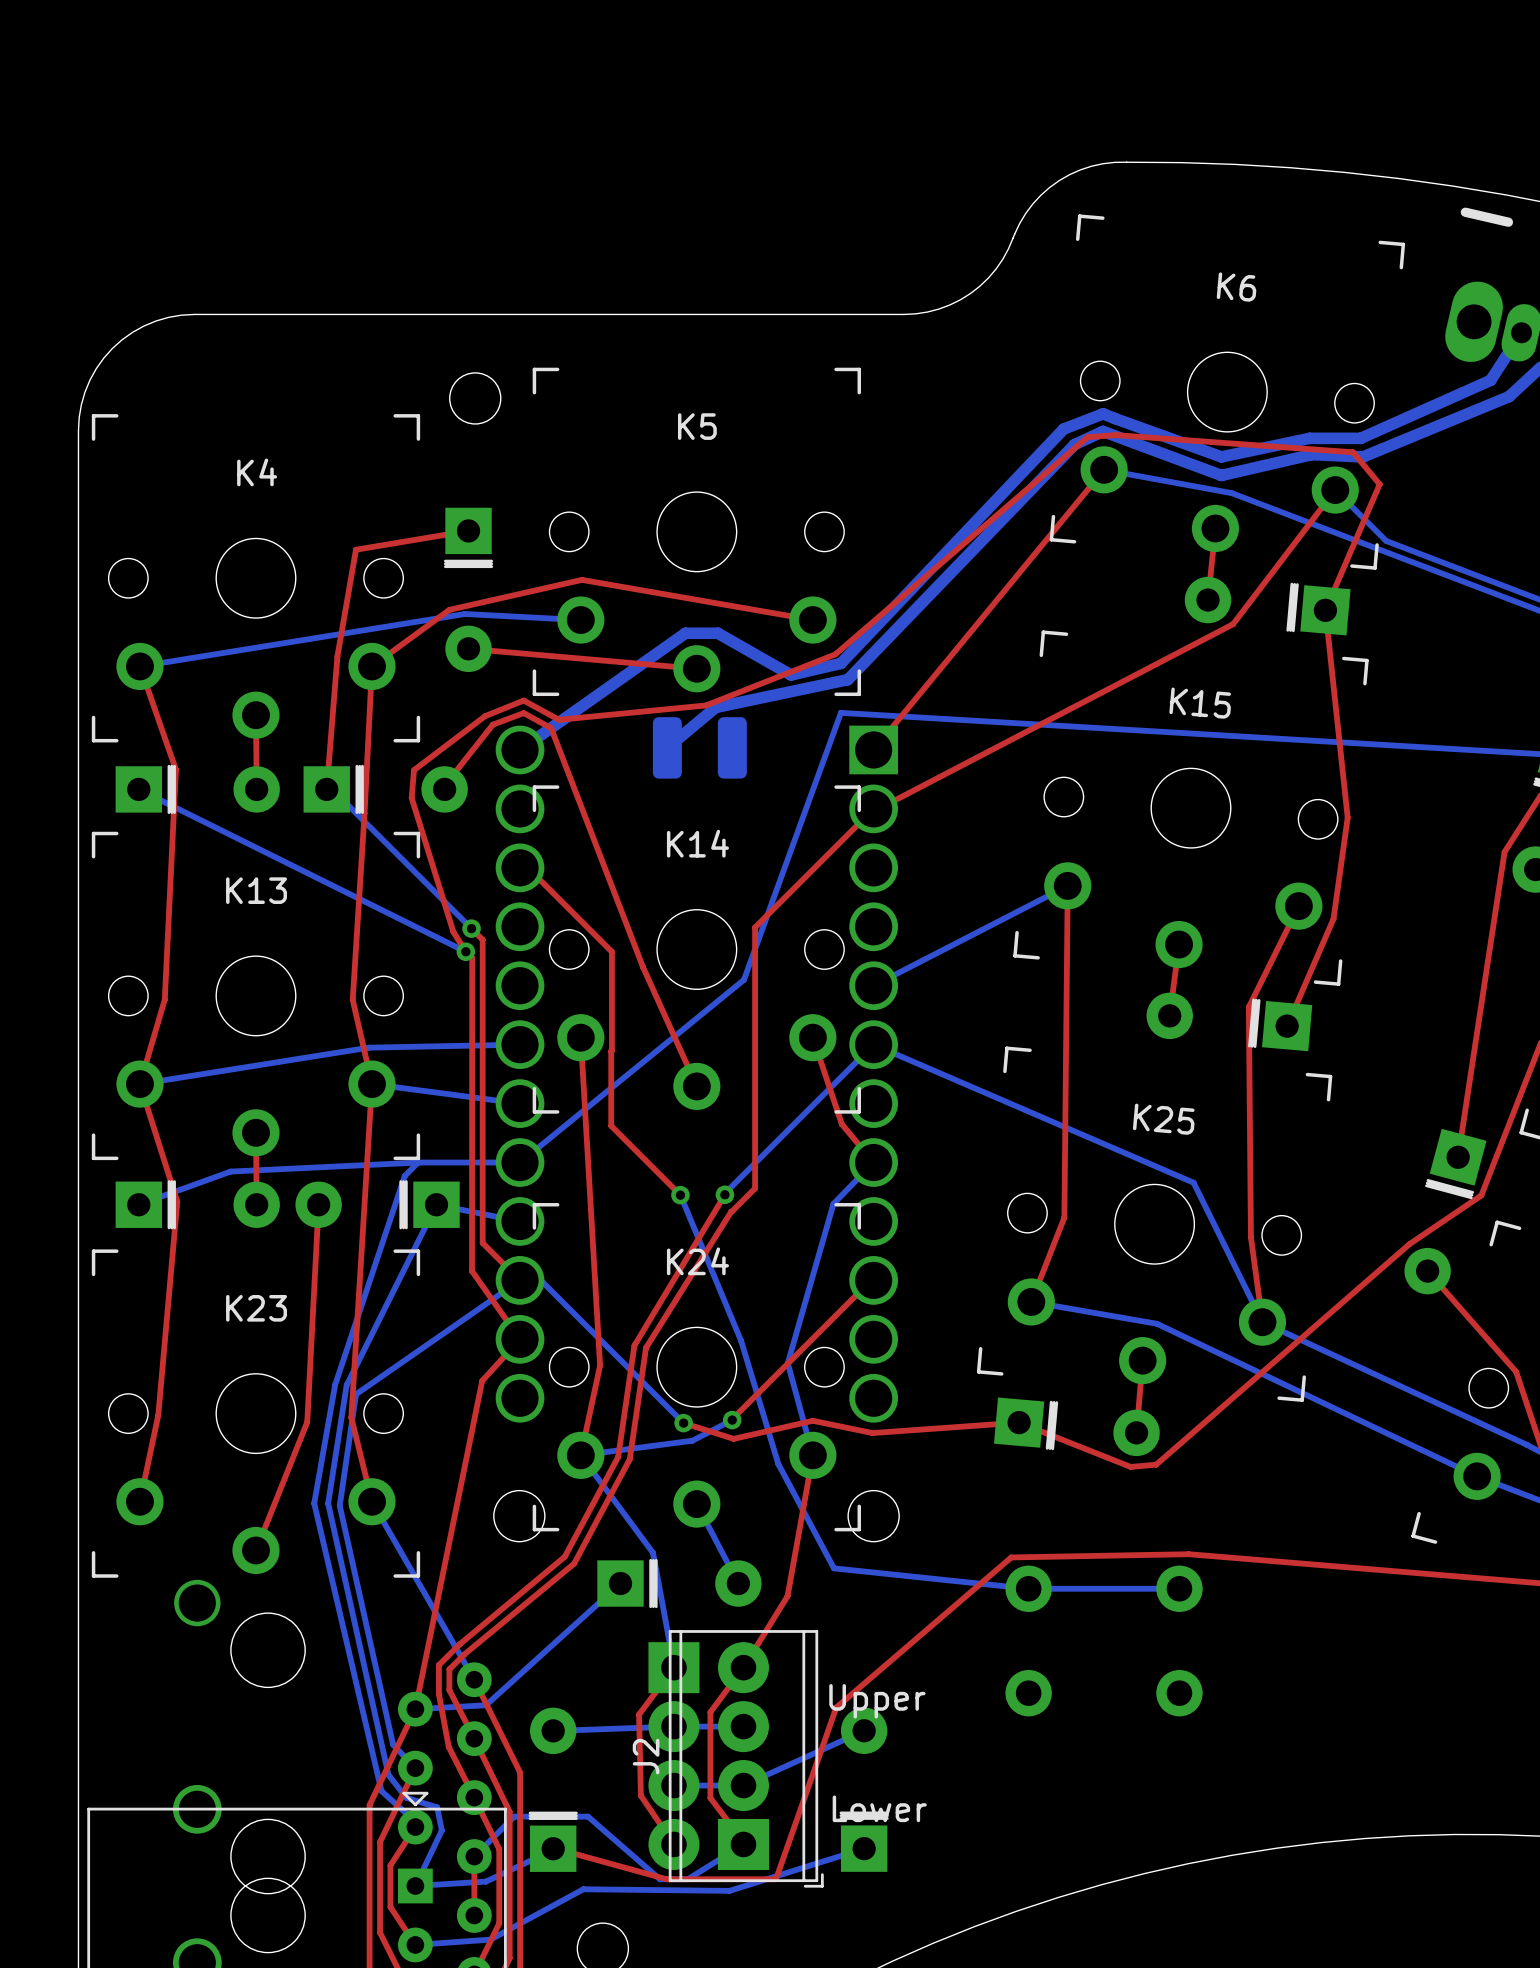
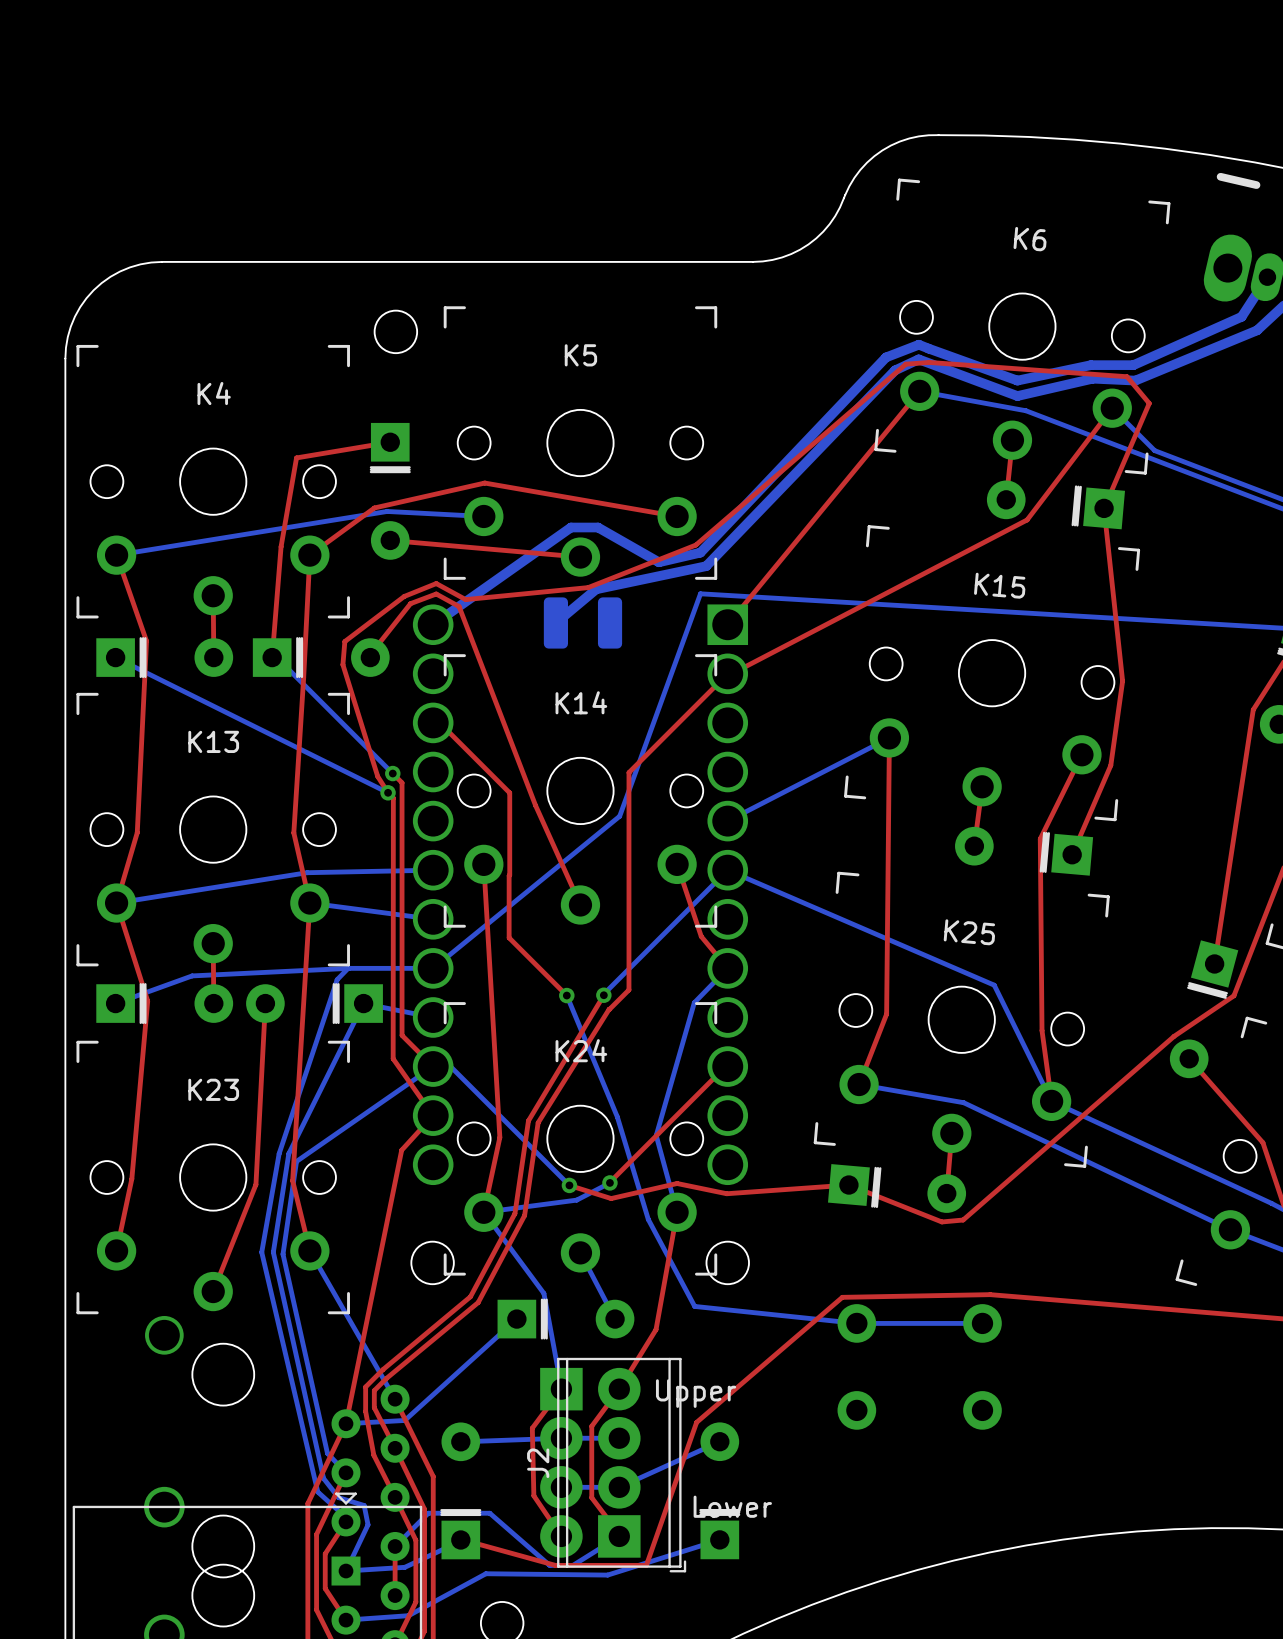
text position: Upper (877, 1701) -> Upper (696, 1393)

